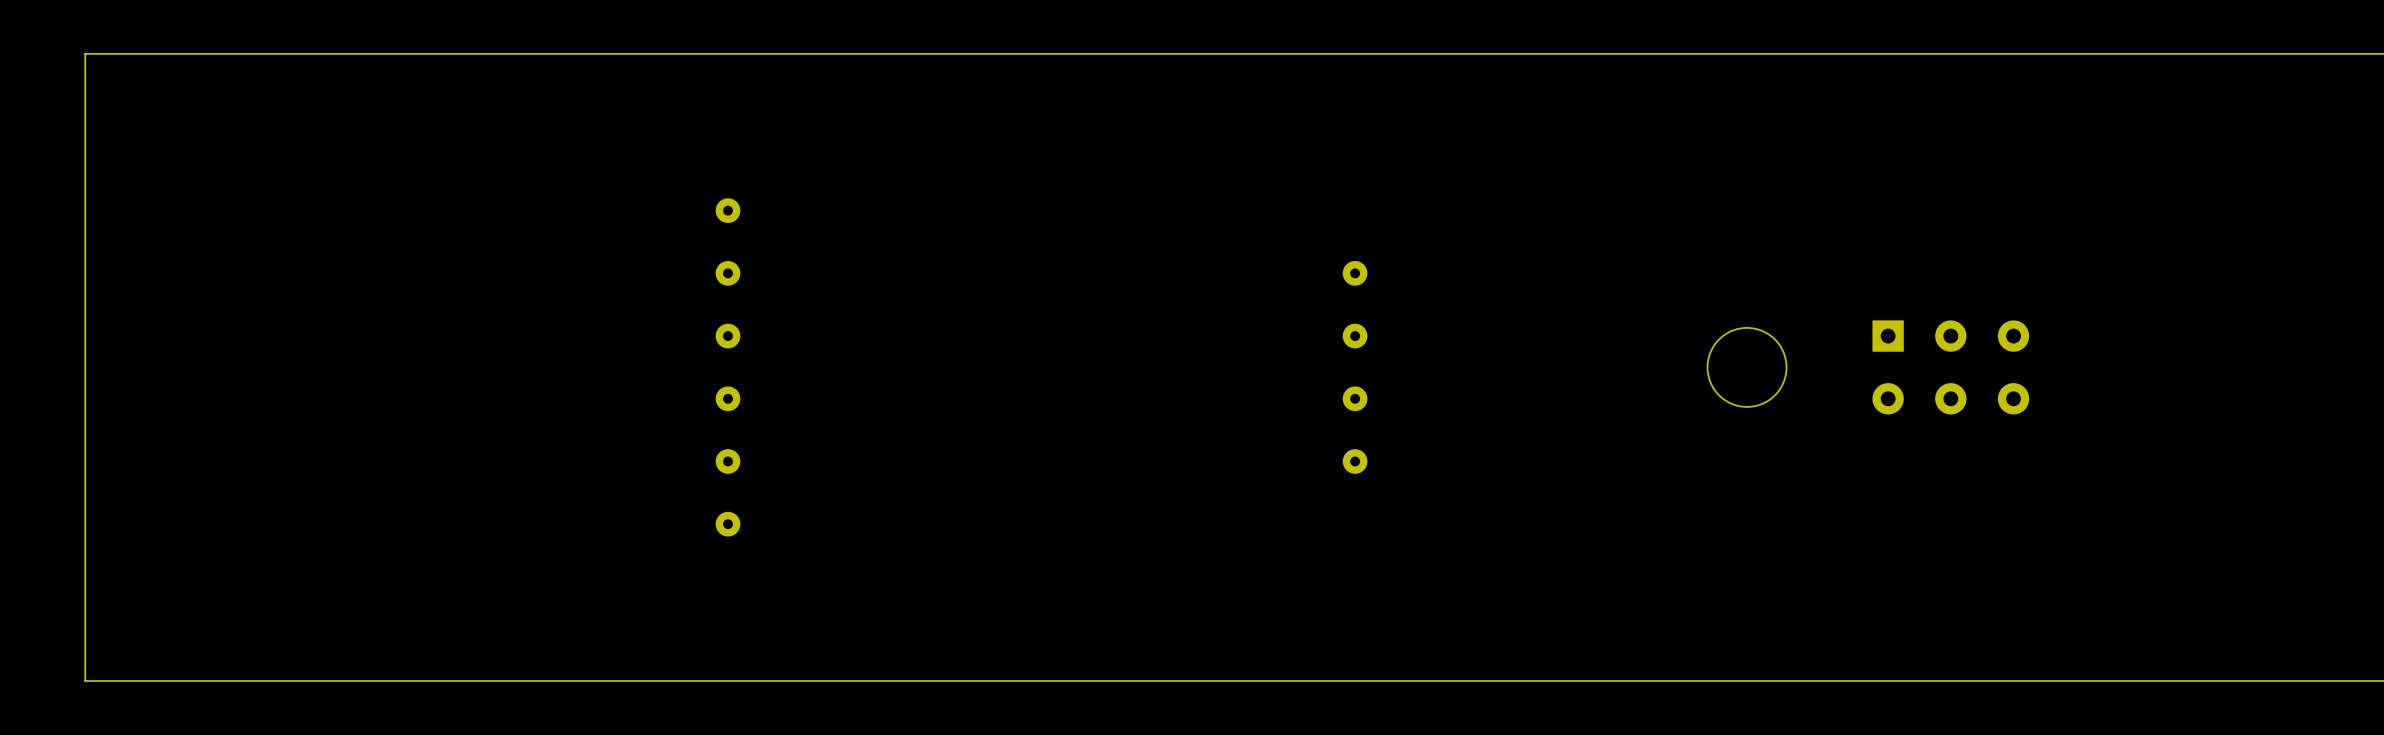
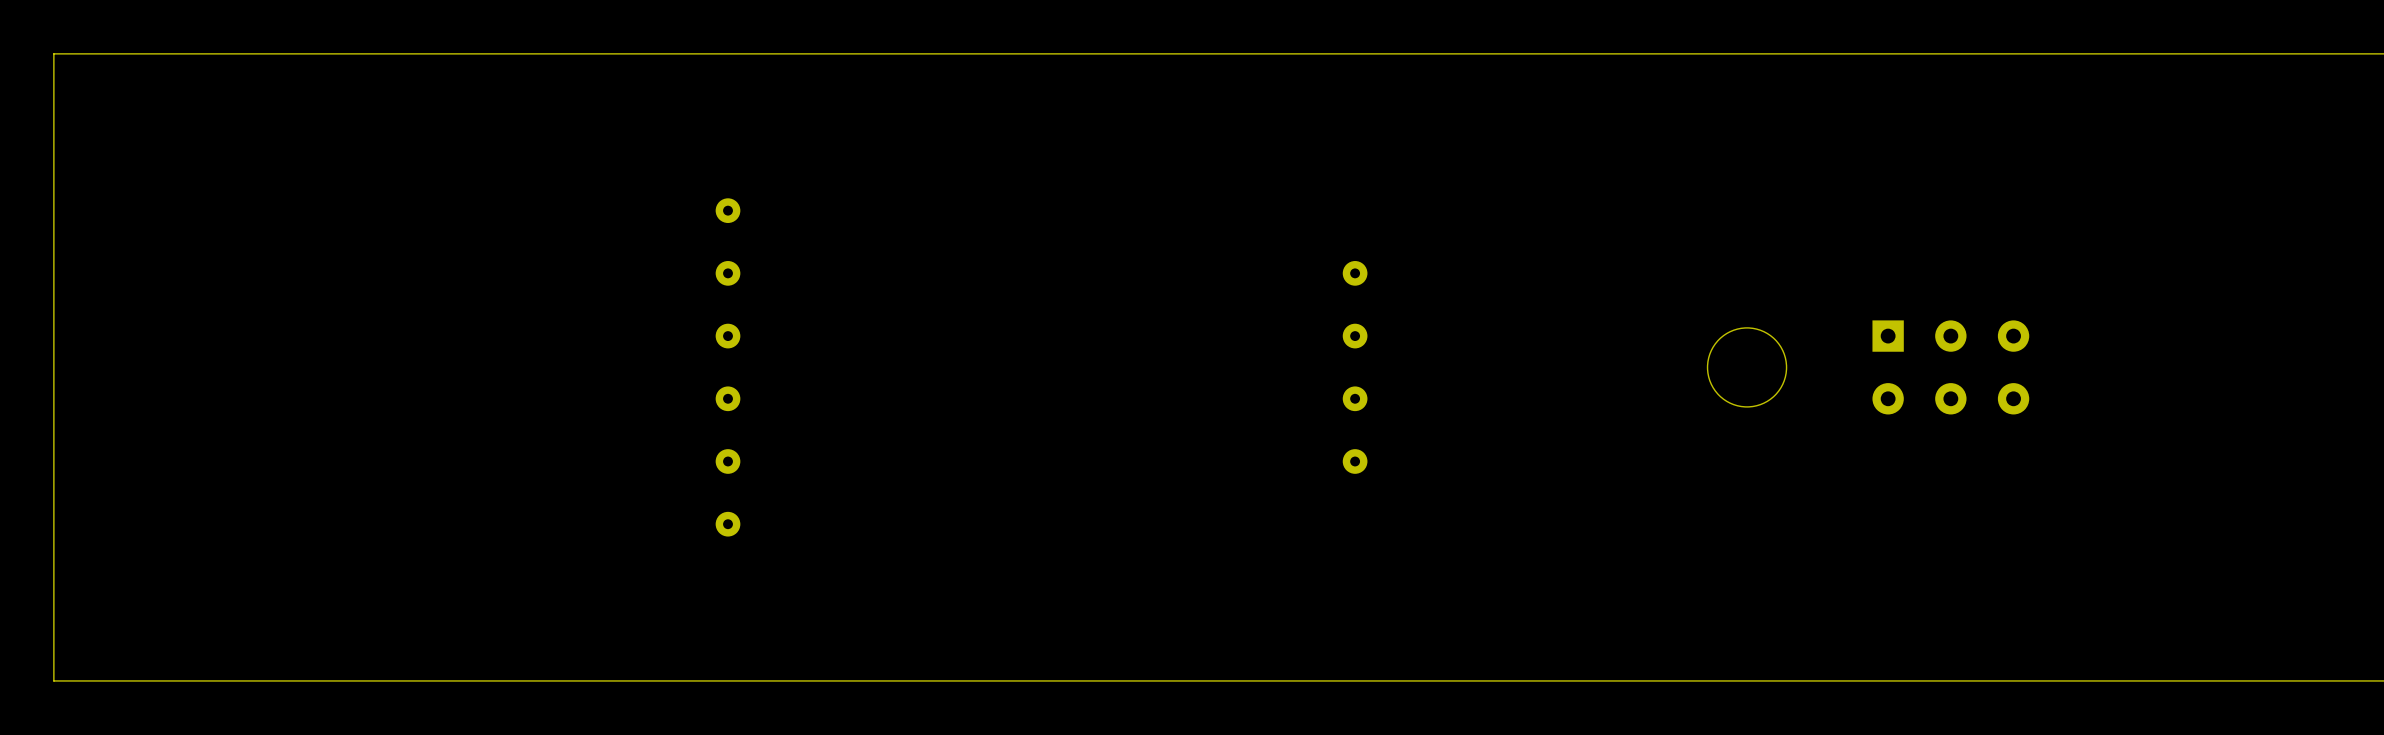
board edge: (85, 53) (85, 680) -> (85, 53) (53, 53) (53, 680) (85, 680)

